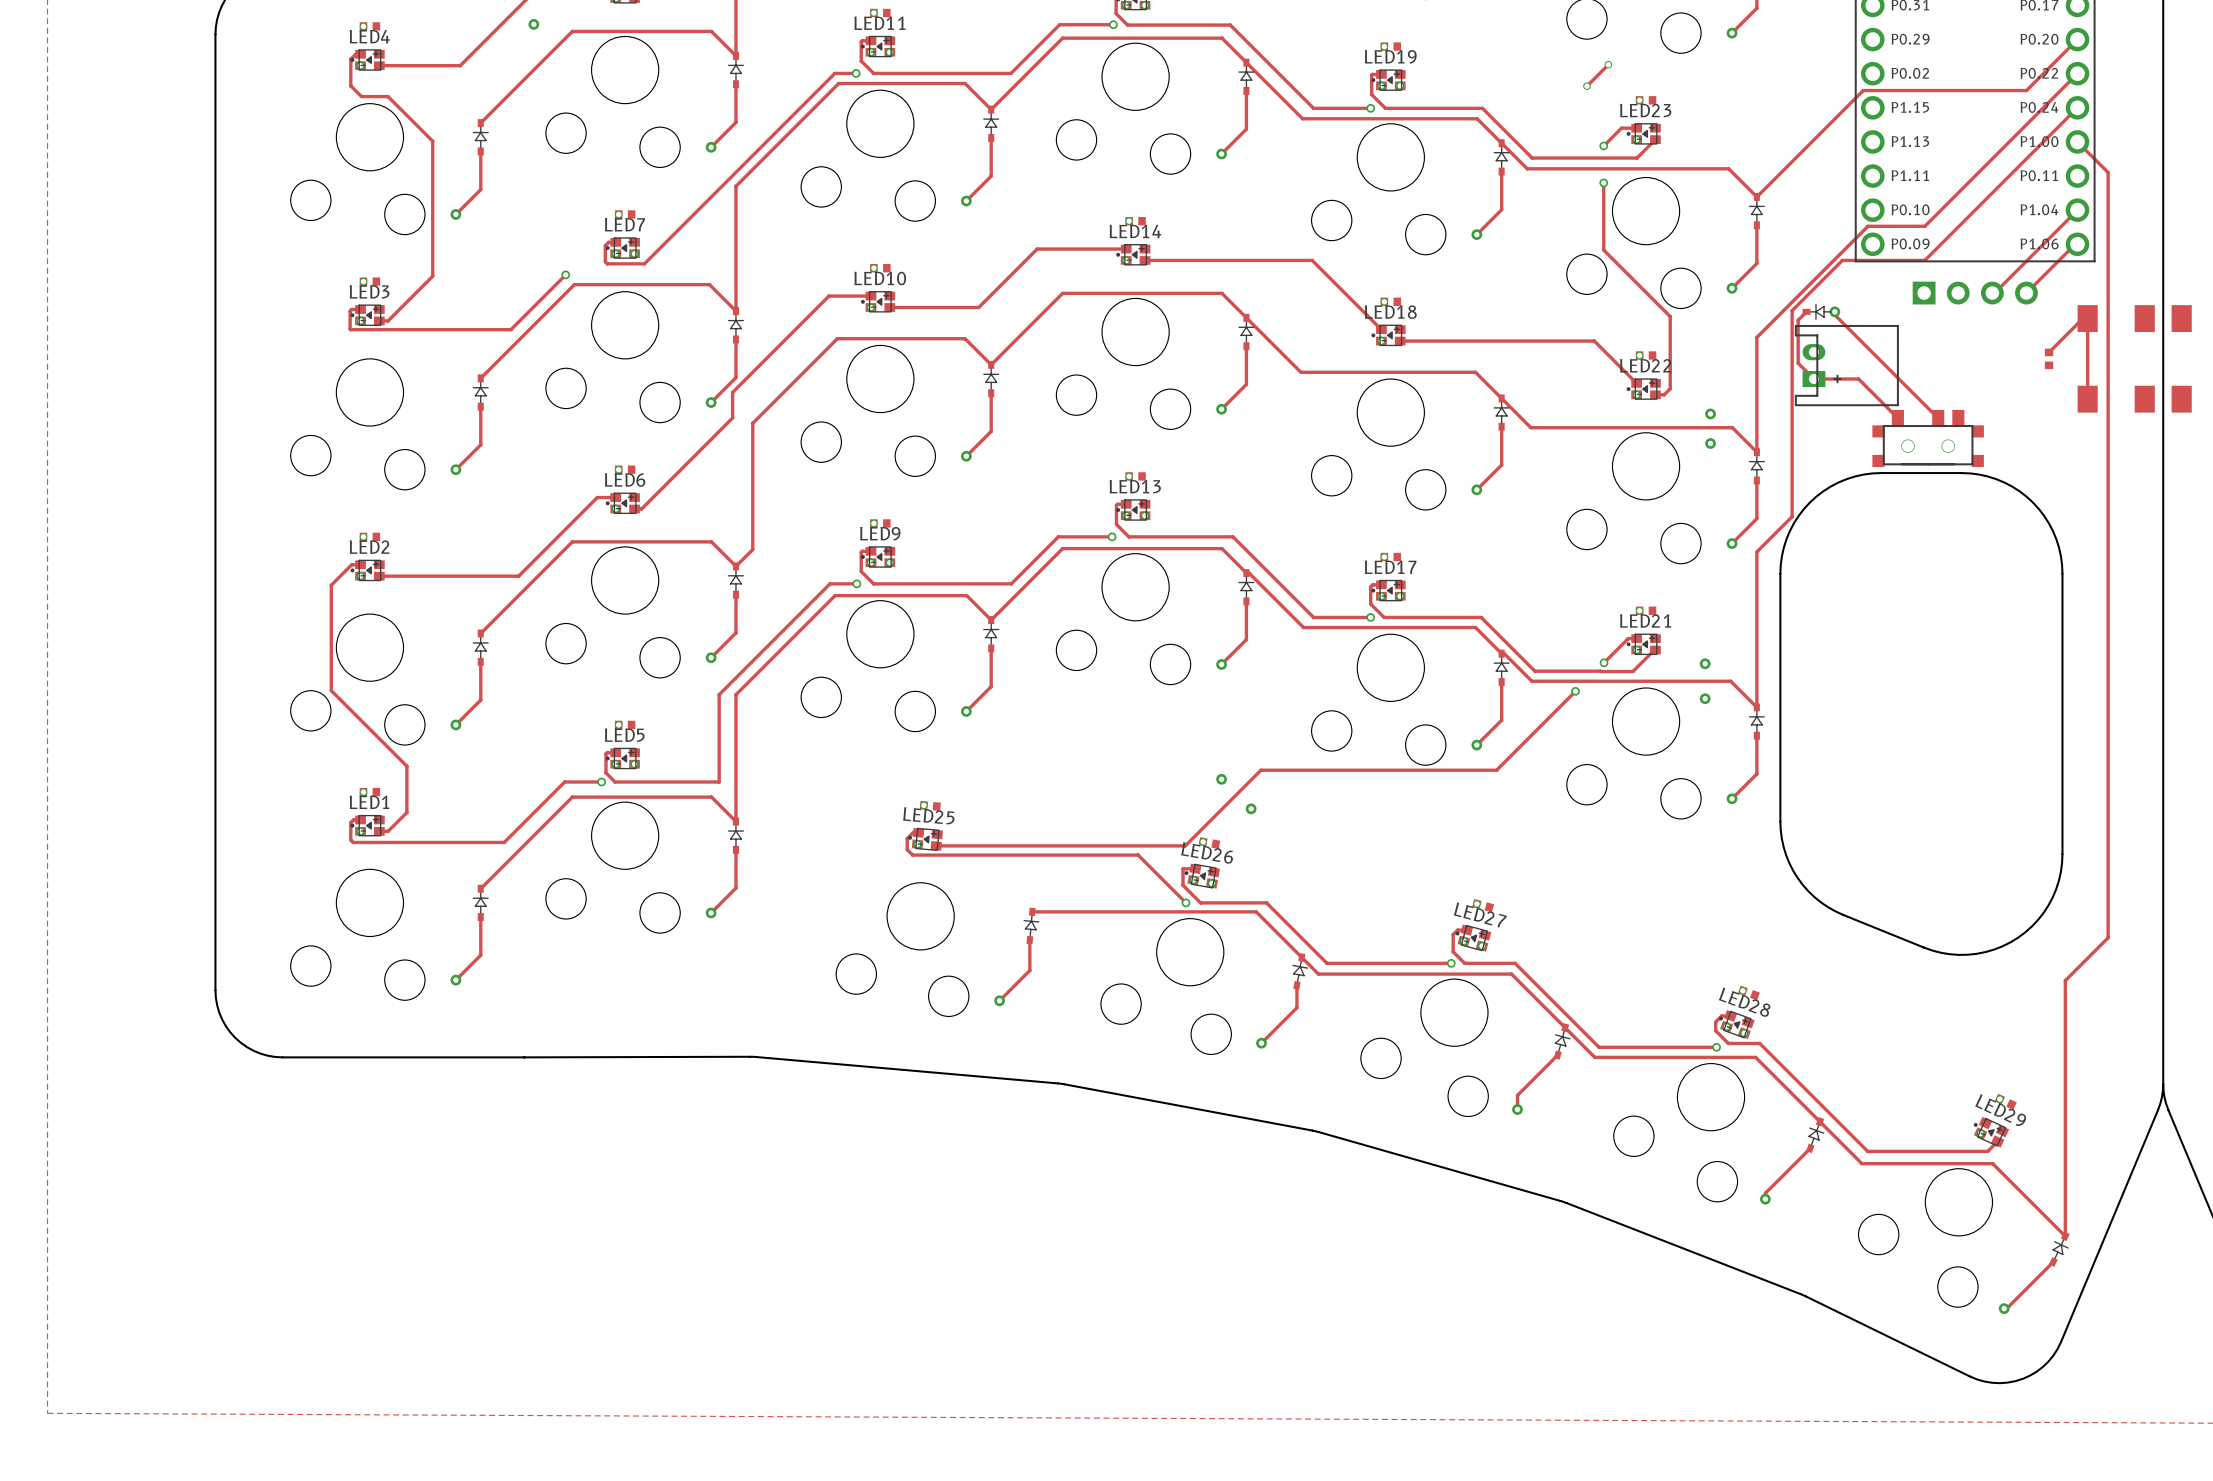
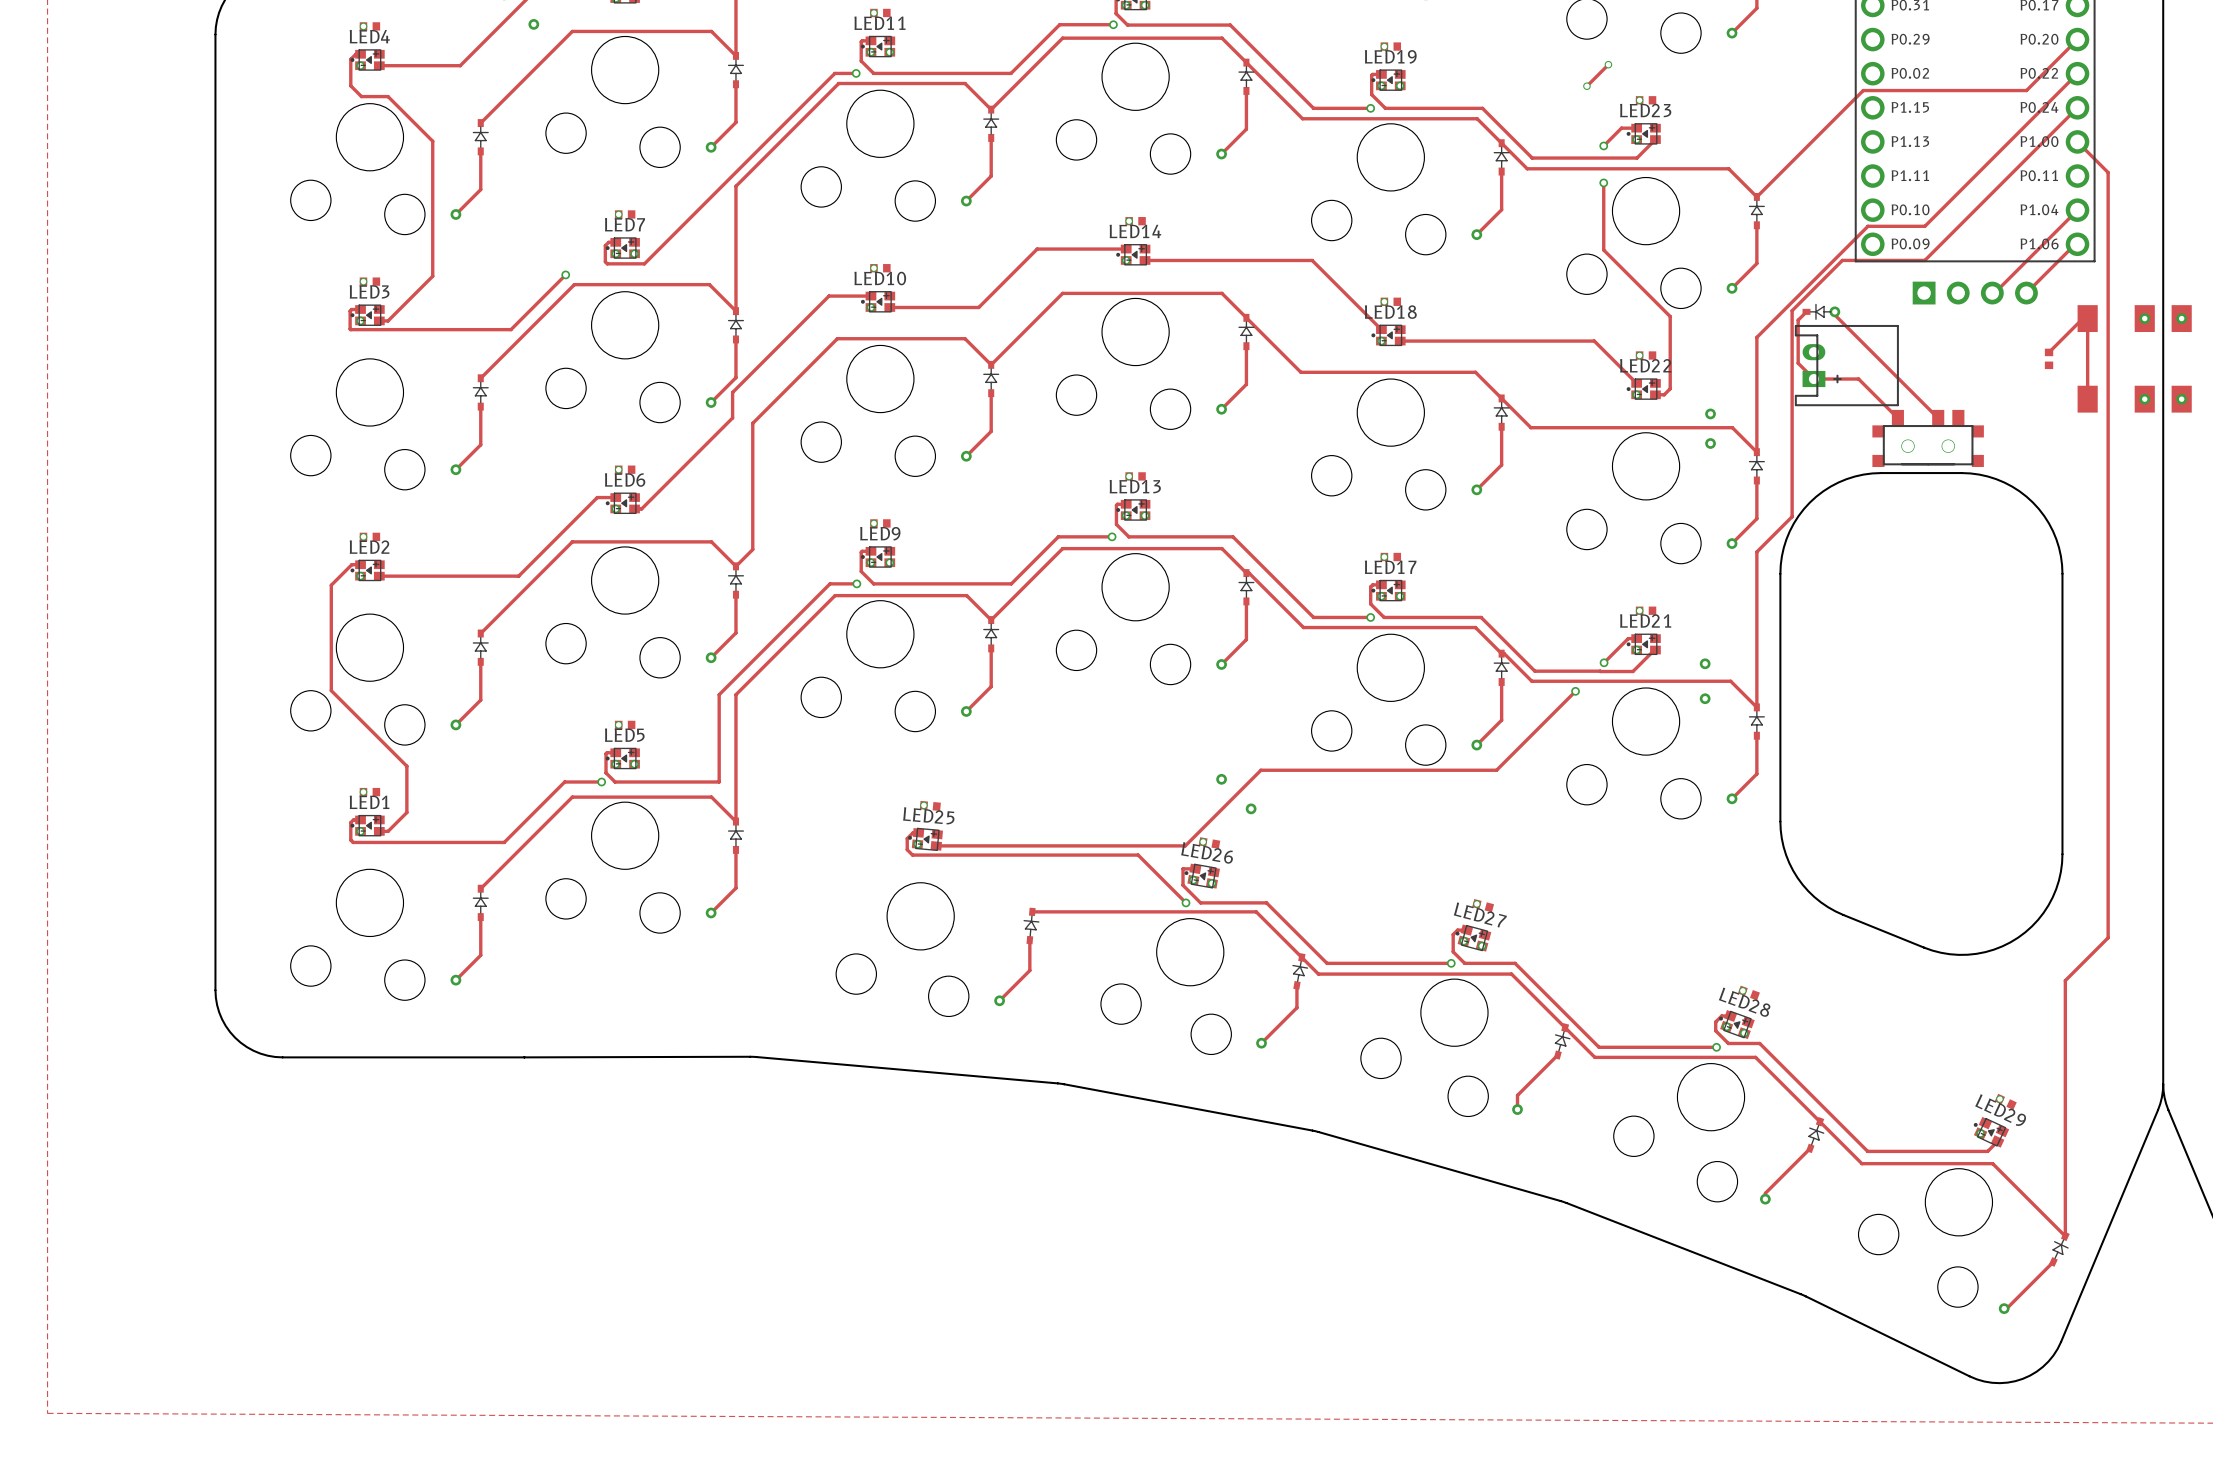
via: none -> (2144, 318)
via: none -> (2181, 318)
via: none -> (2144, 399)
via: none -> (2181, 399)

